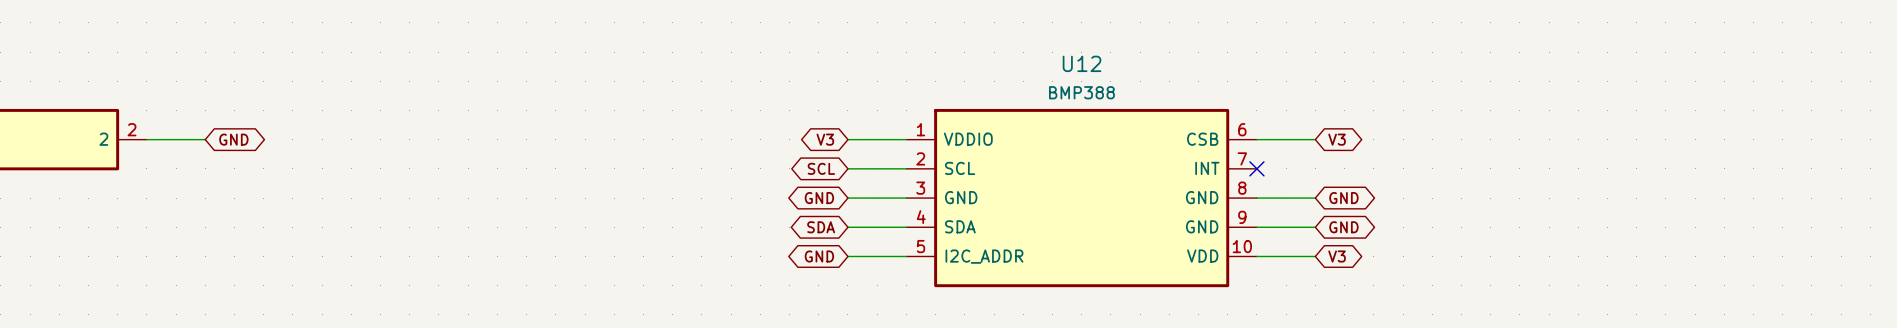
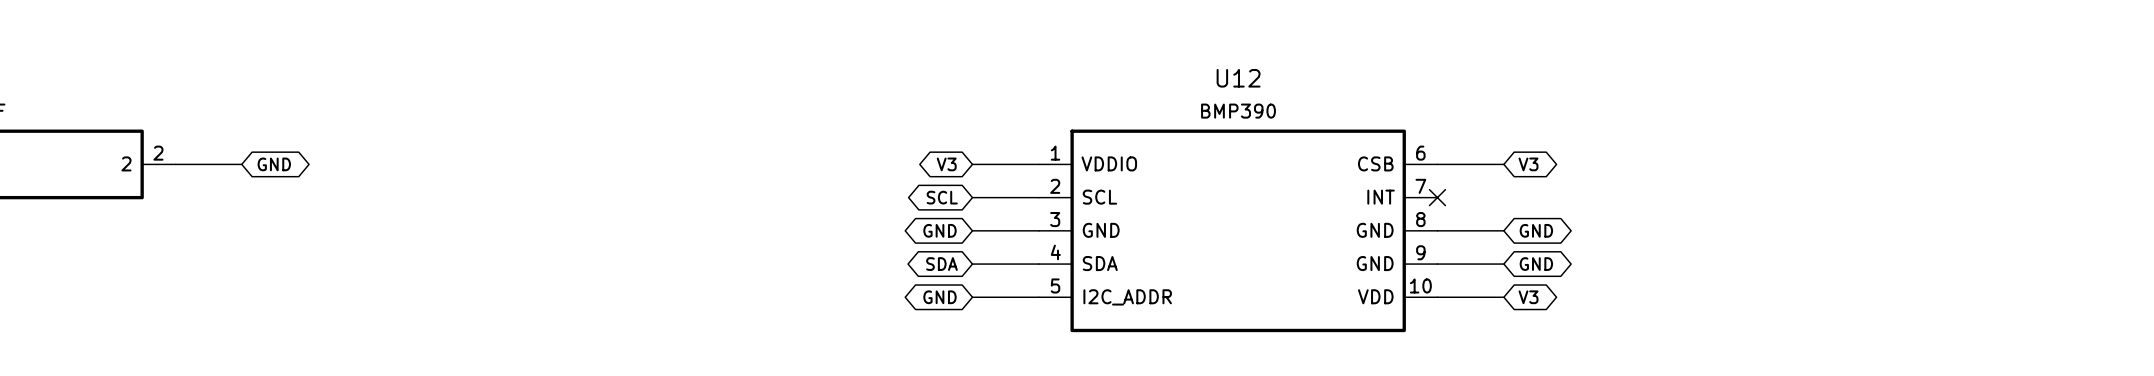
U12 value: BMP388 (1081, 92) -> BMP390 (1238, 111)

